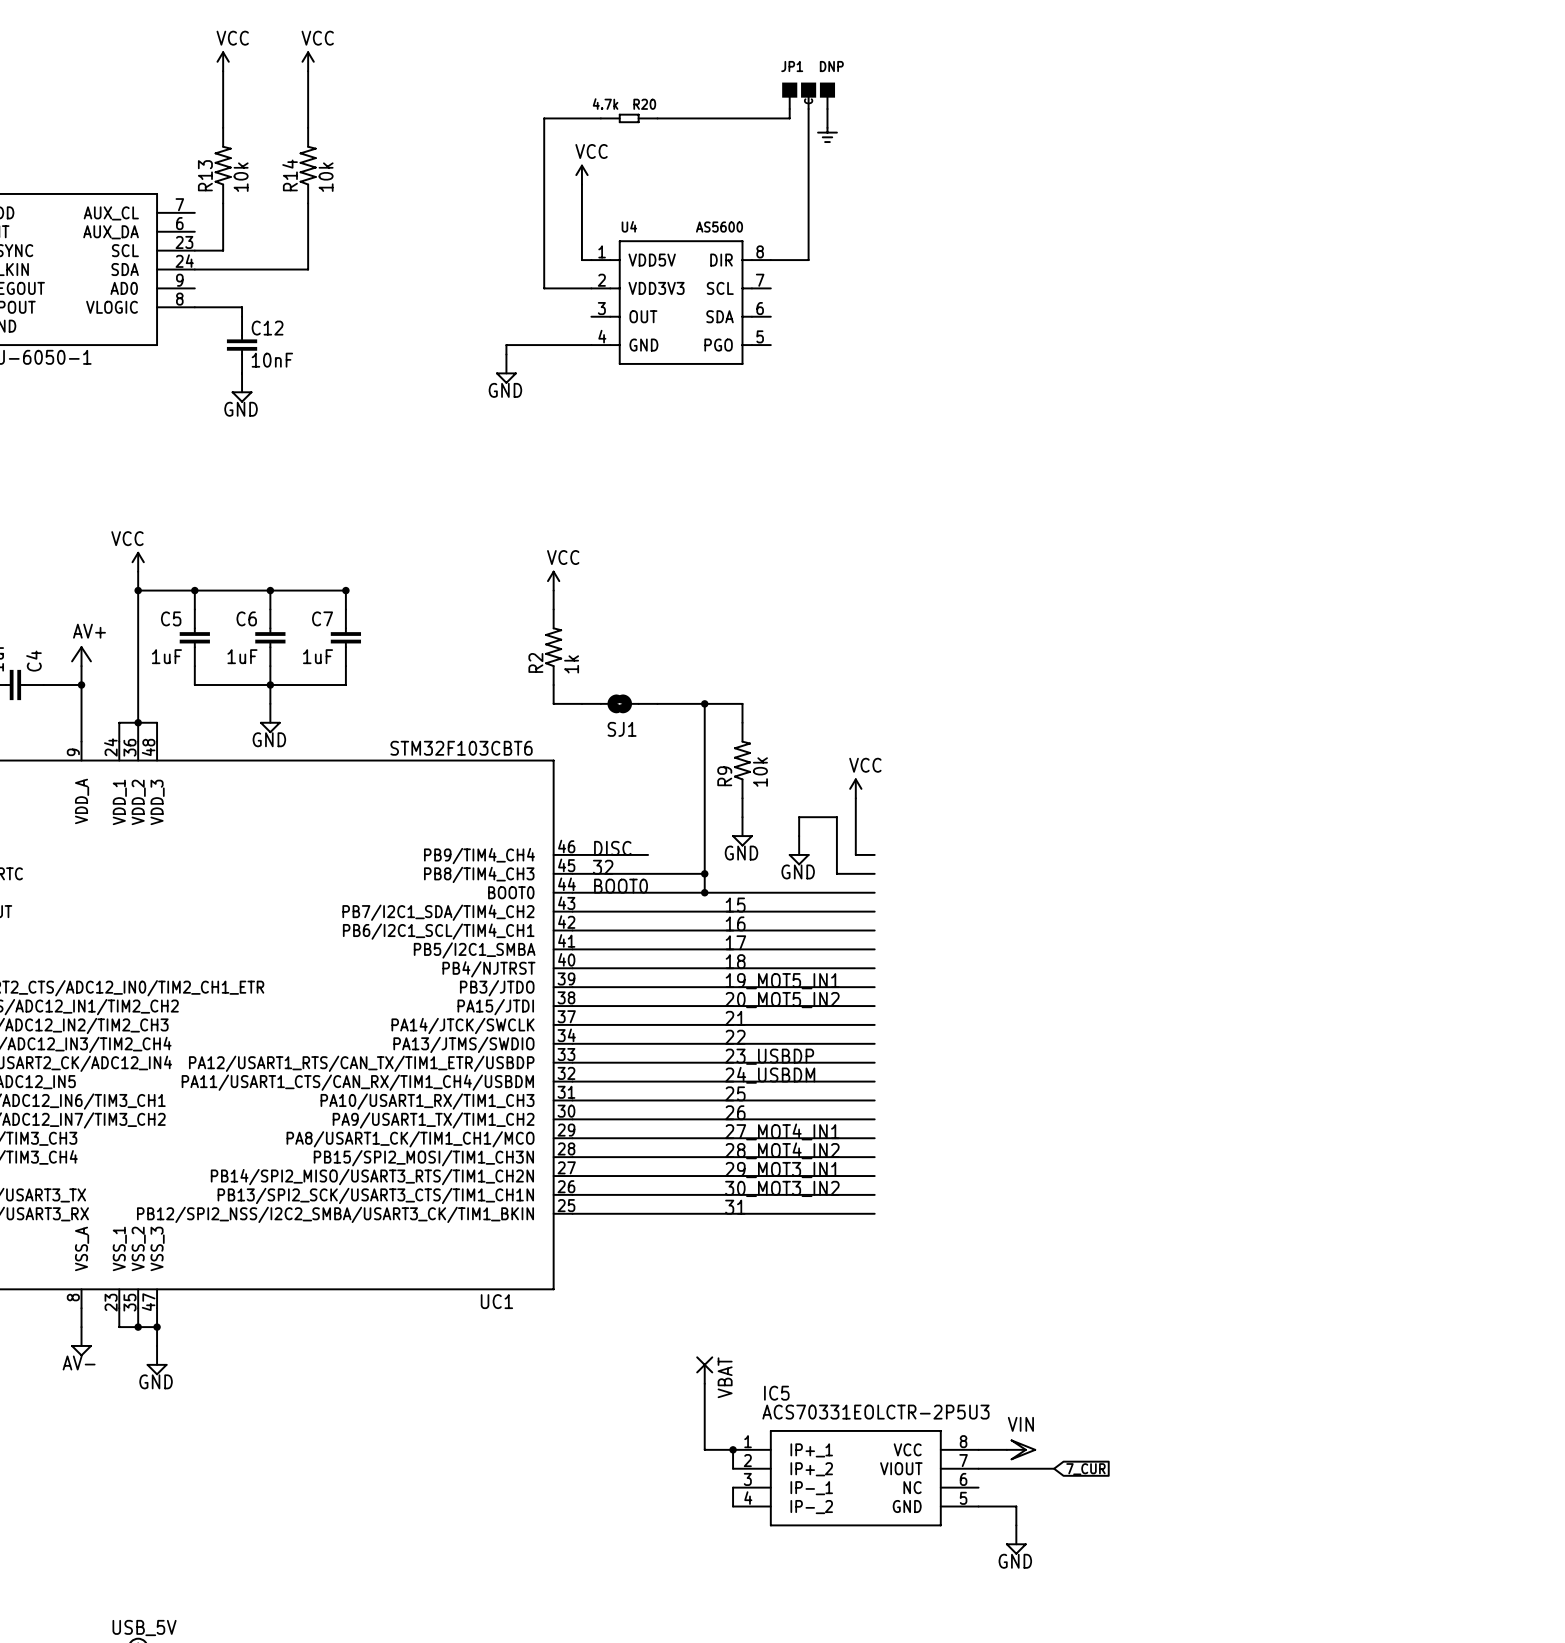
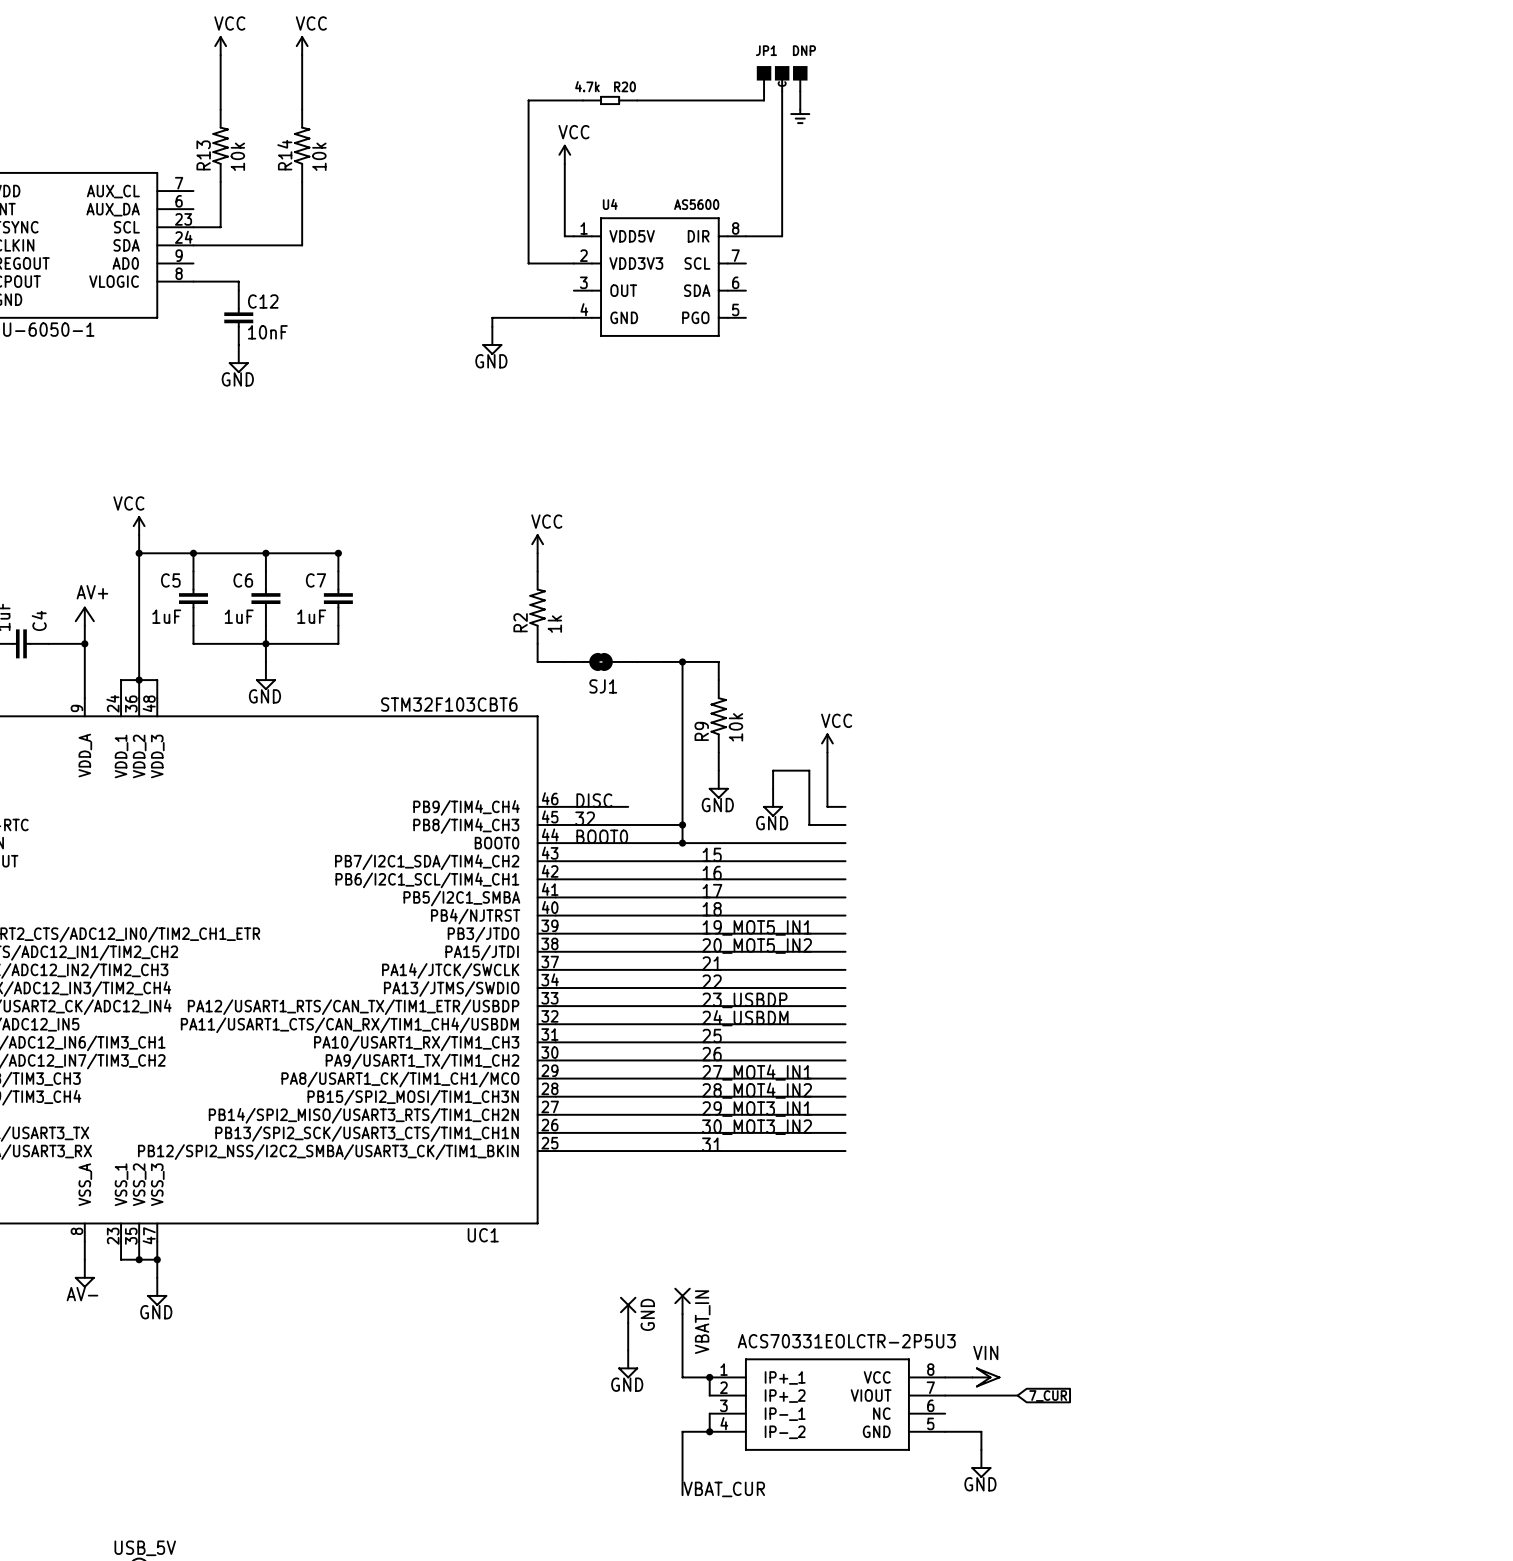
VBAT name: VBAT (725, 1377) -> VBAT_IN (702, 1322)
GND: none -> (628, 1309)
wire: none -> (628, 1323) (628, 1350)
IC5 name: IC5 (776, 1393) -> none
power symbol: none -> GND (628, 1364)
wire: none -> (709, 1431) (682, 1431) (682, 1495)
junction: none -> (709, 1431)
label: none -> VBAT_CUR (724, 1489)

